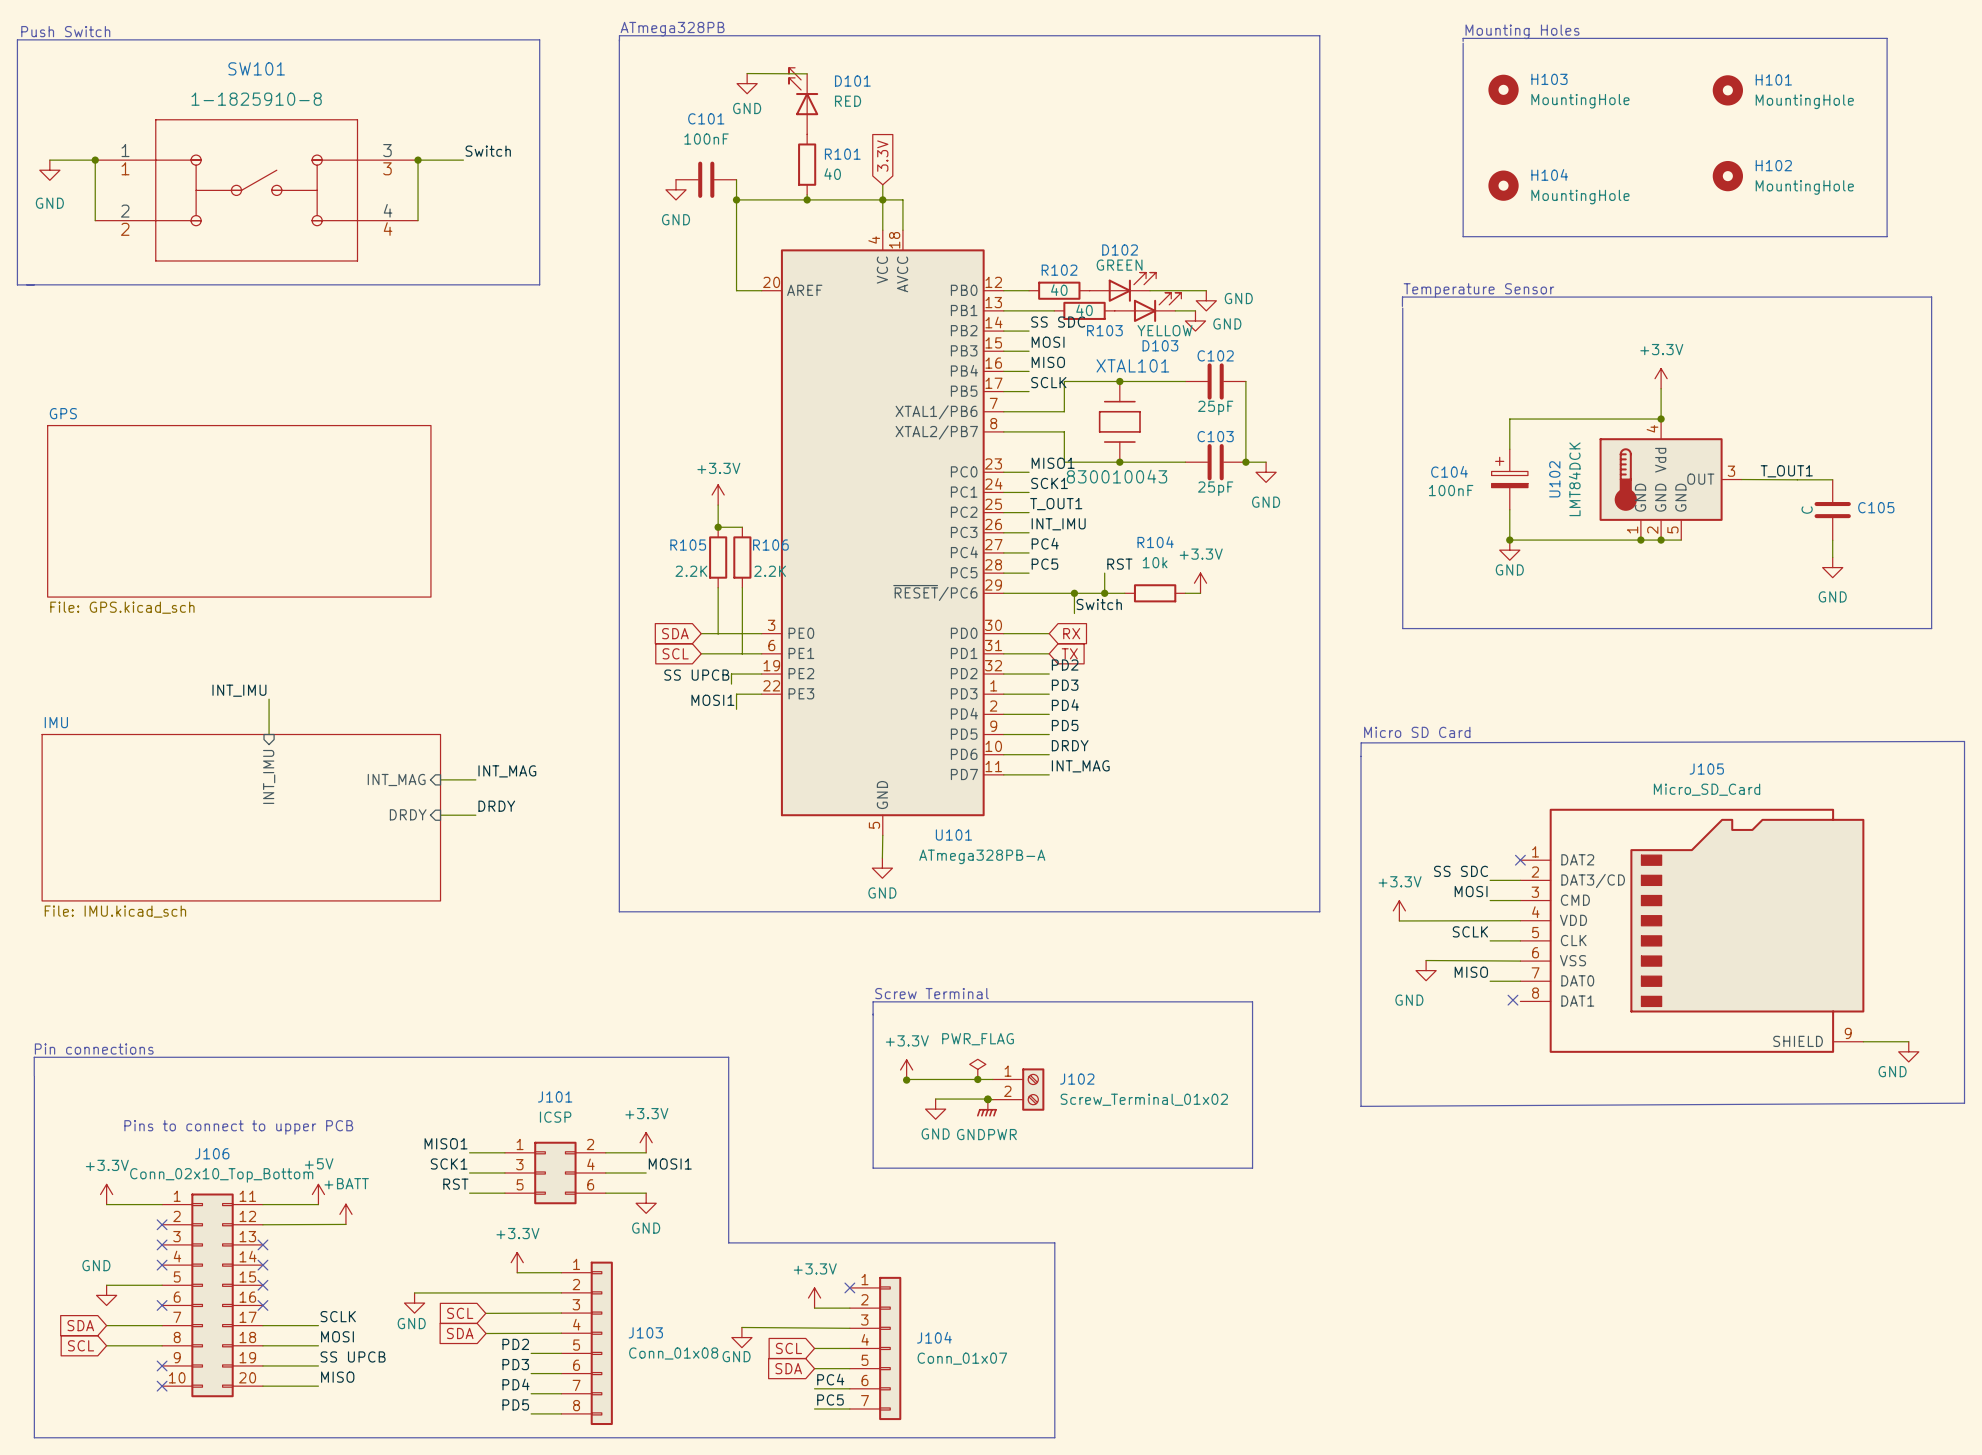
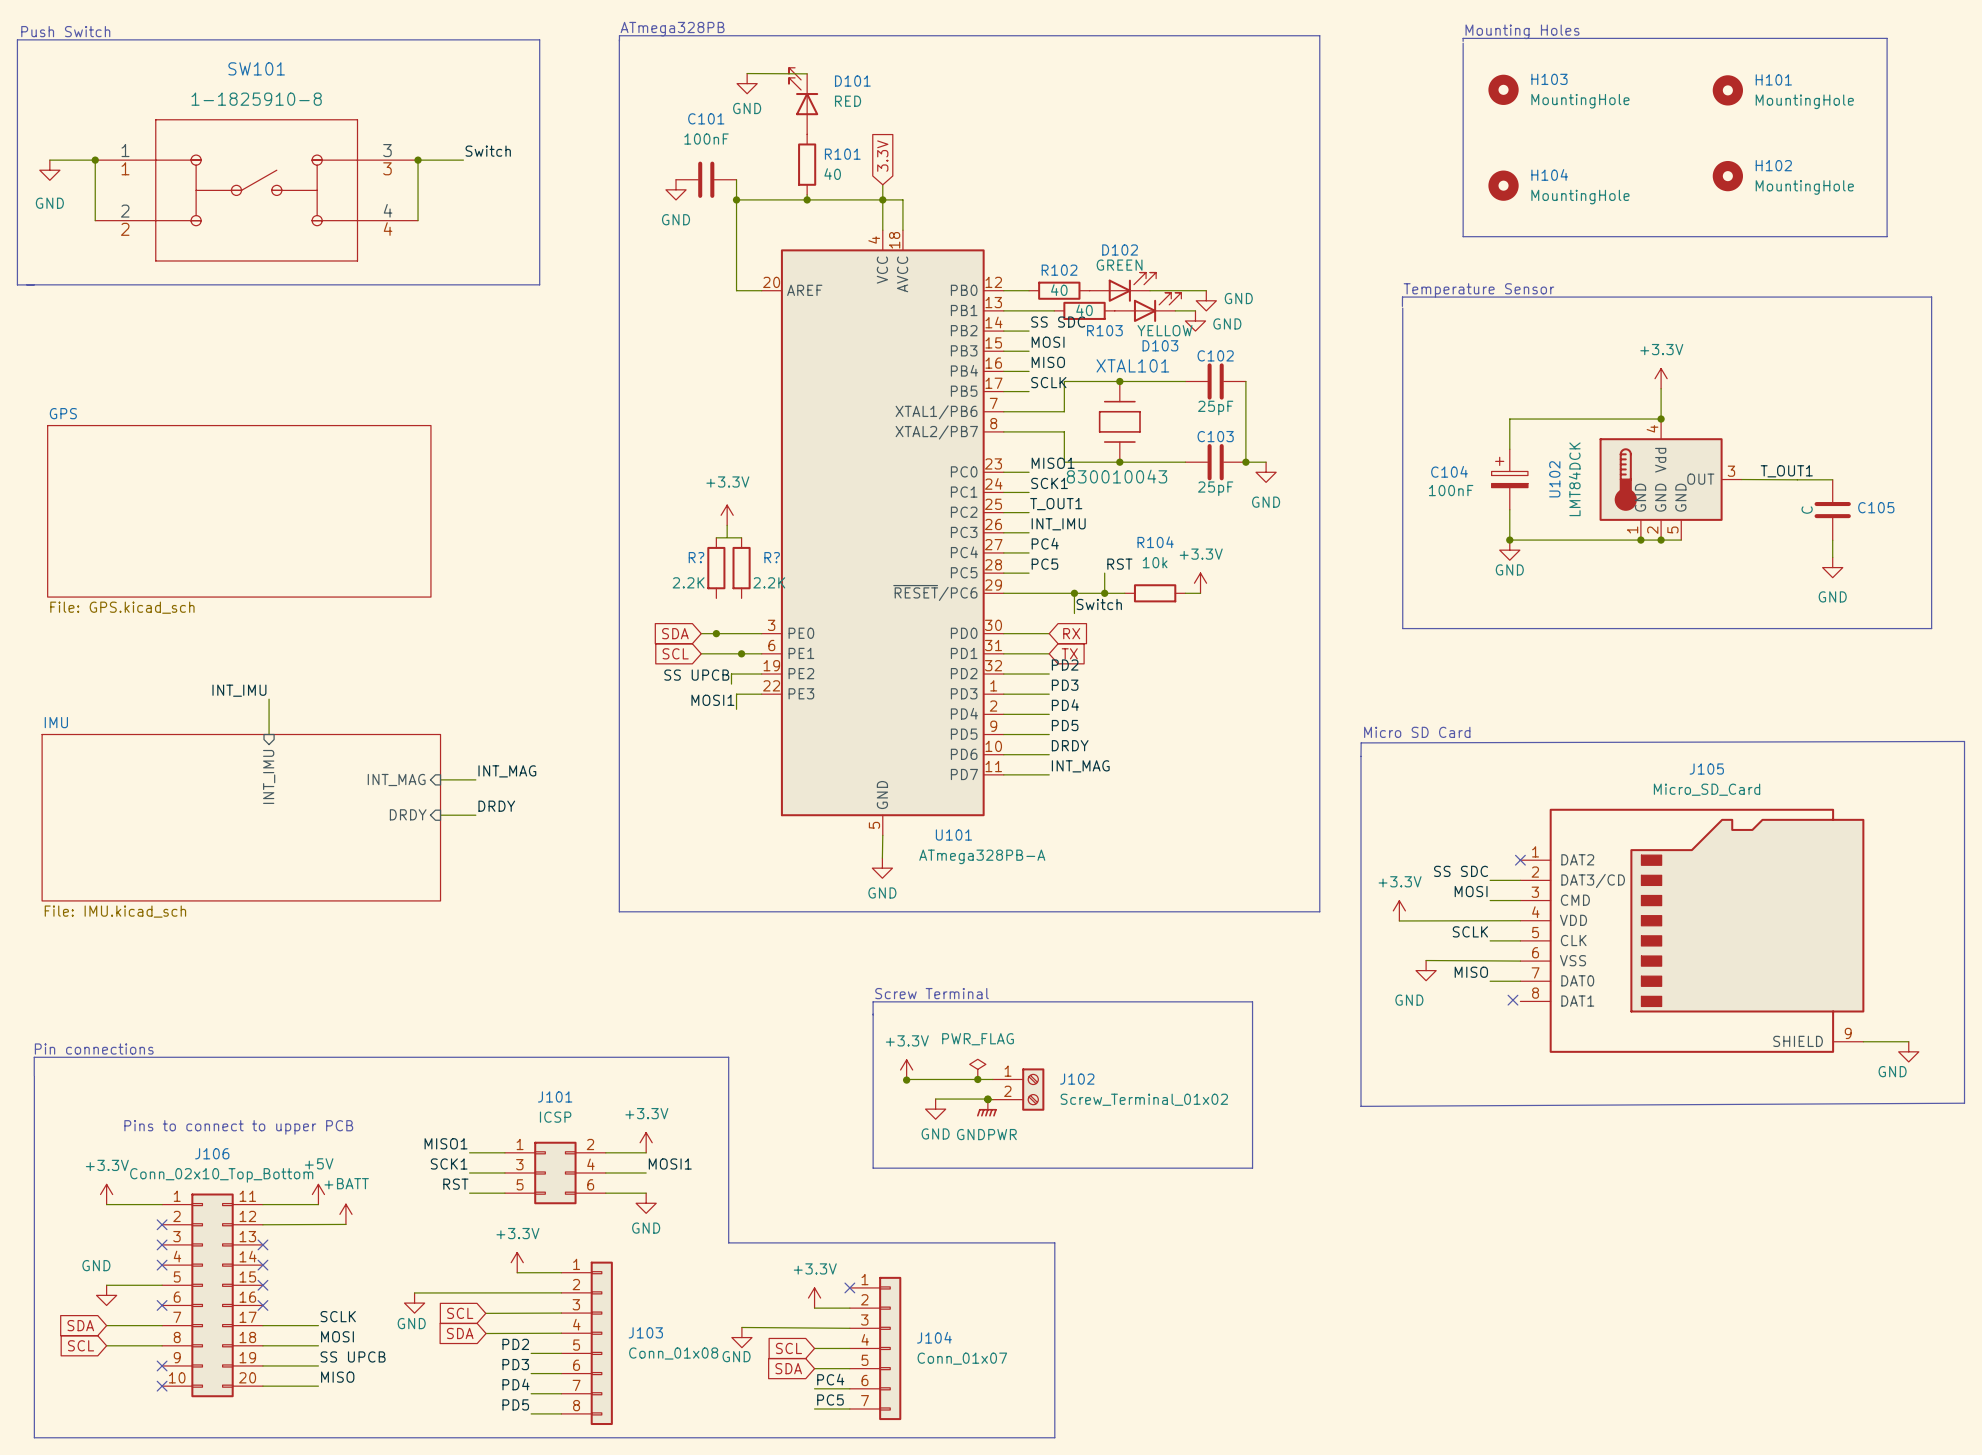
power symbol text position: +3.3V (718, 468) -> +3.3V (727, 481)
power symbol position: +3.3V (718, 494) -> +3.3V (727, 515)
wire: (718, 505) (718, 527) (742, 527) -> none
wire: none -> (727, 525) (727, 537)
junction: (718, 527) -> none
wire: none -> (716, 537) (741, 537)
R105: 2.2K (718, 557) -> none
R106: 2.2K (742, 557) -> none
R?: none -> 2.2K (716, 568)
R?: none -> 2.2K (741, 568)
wire: (718, 587) (718, 634) -> none
wire: (742, 587) (742, 654) -> none
junction: none -> (716, 633)
junction: none -> (741, 653)

